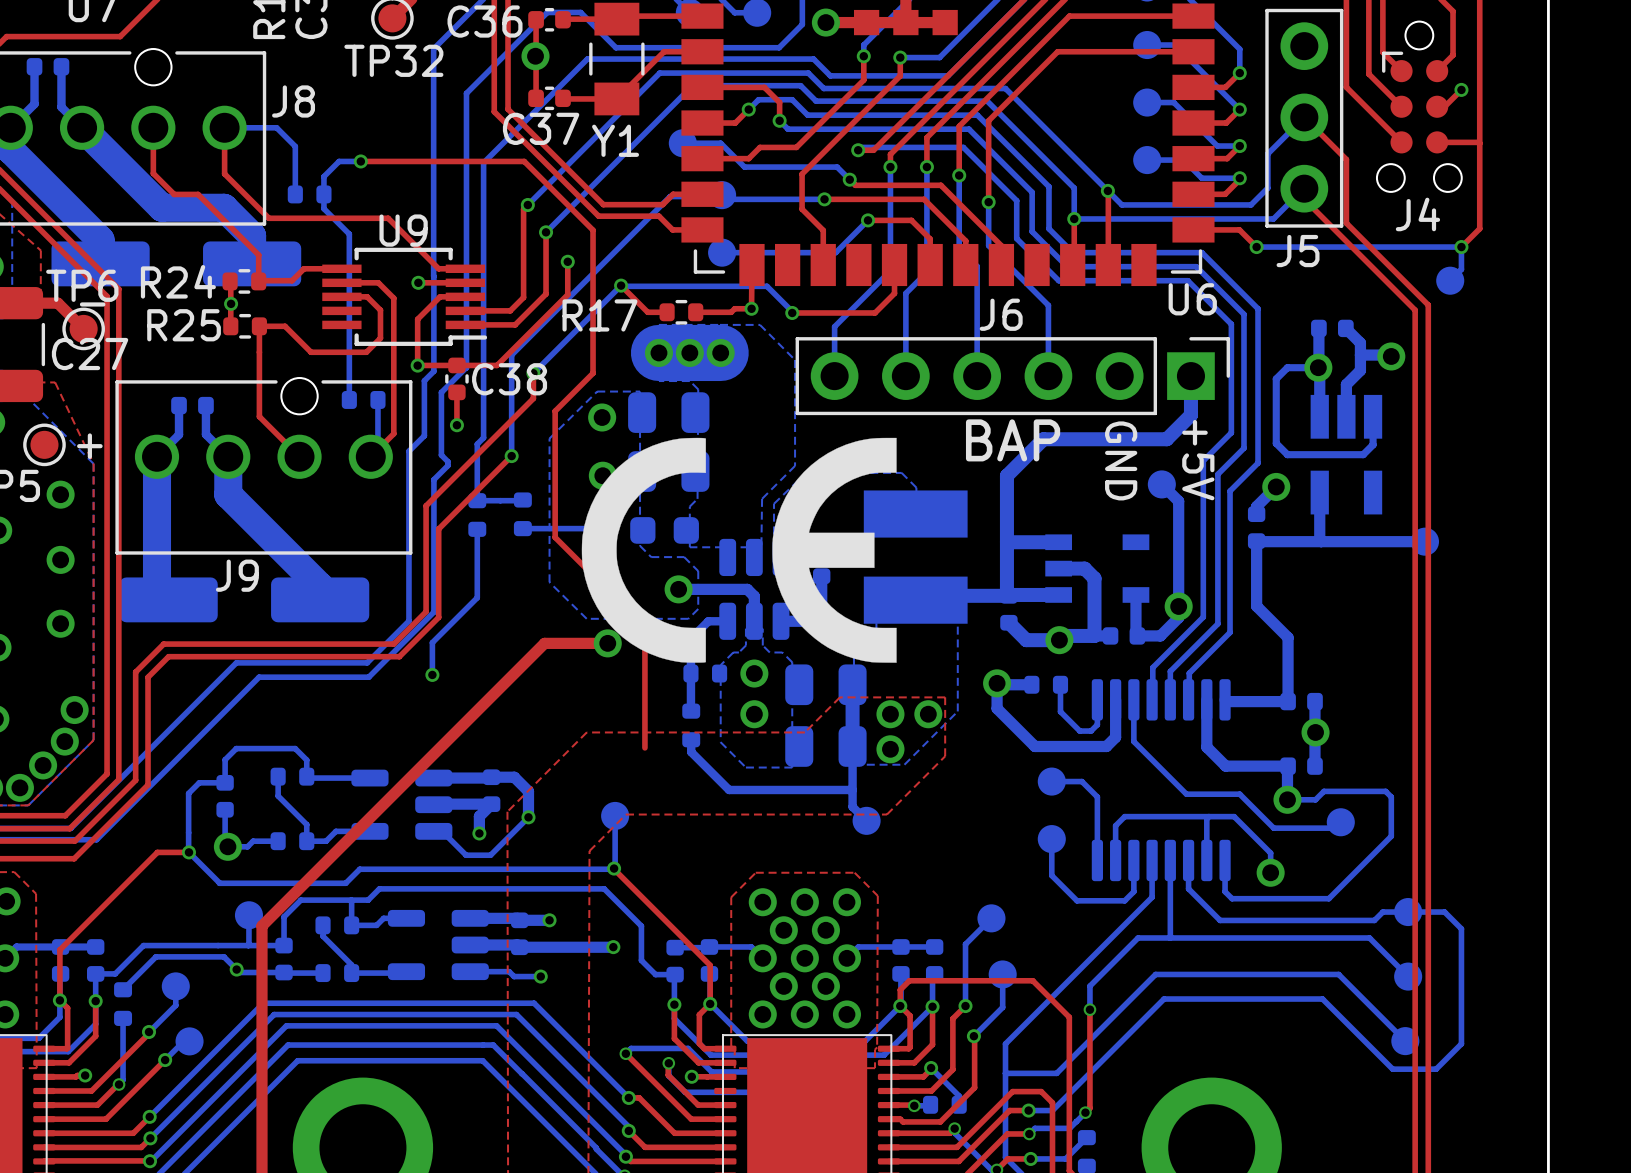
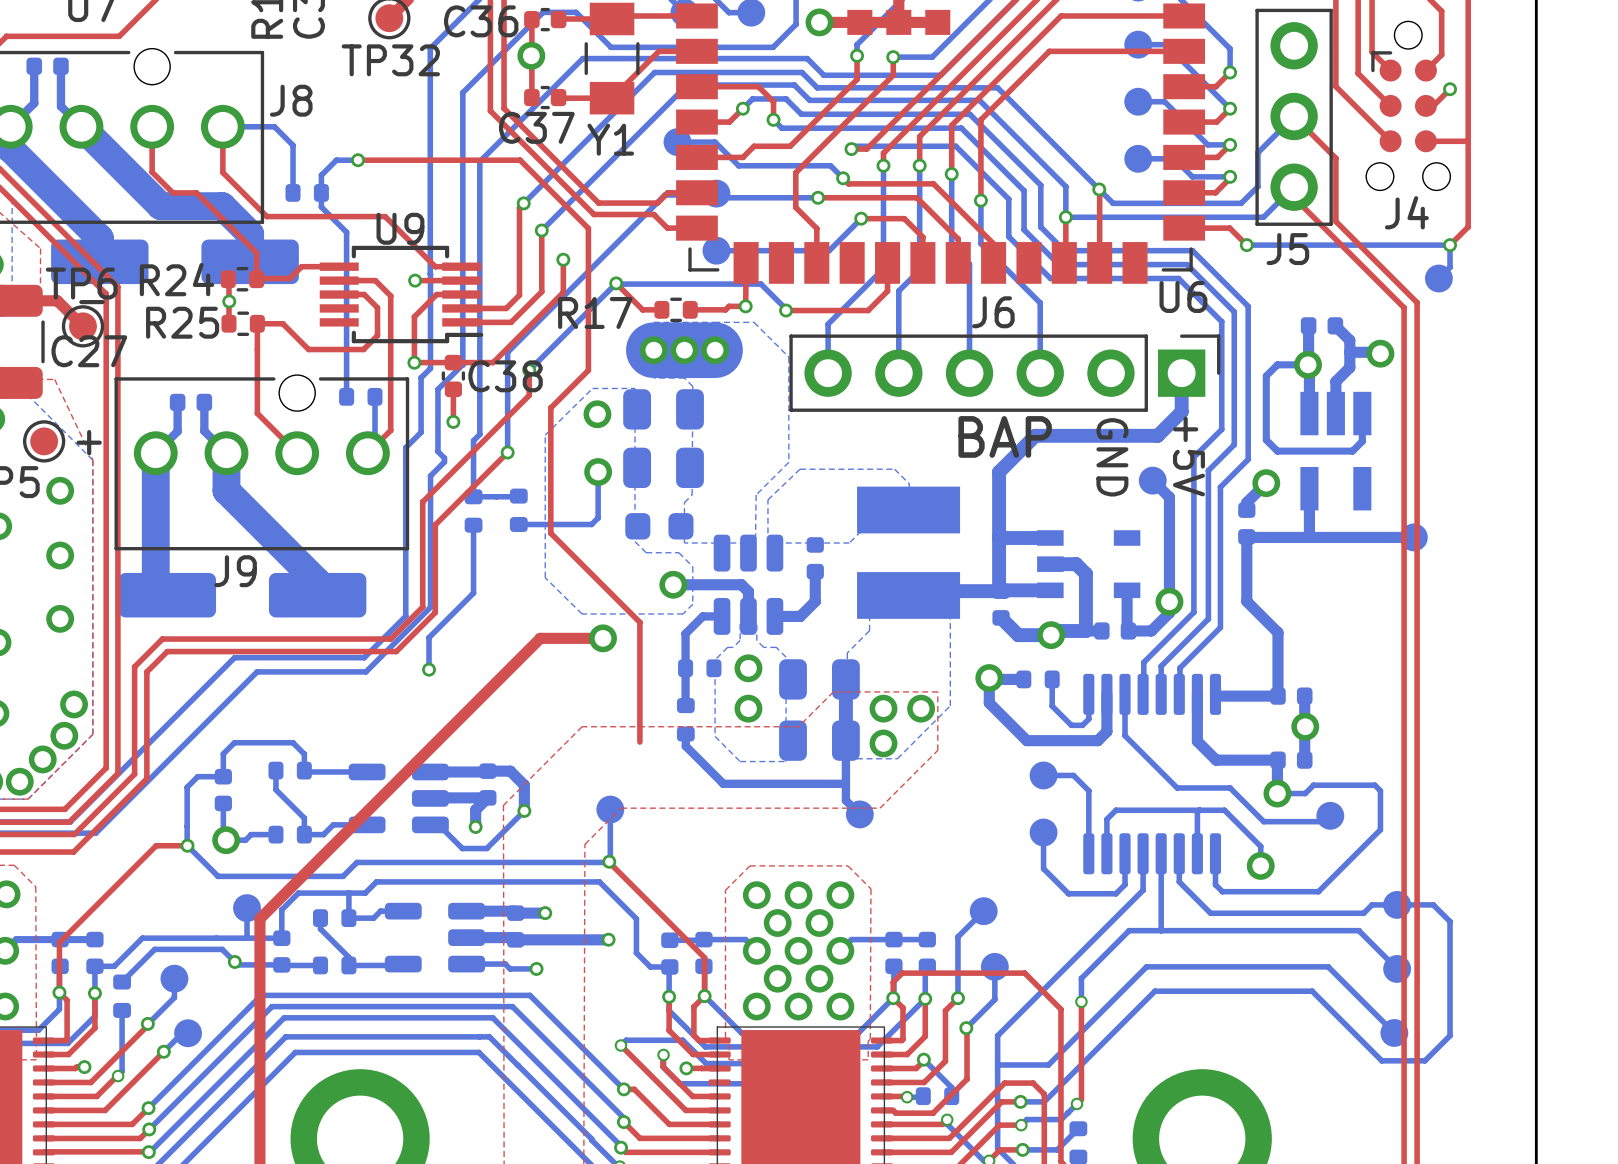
drawing: [581, 437, 897, 663] -> none

